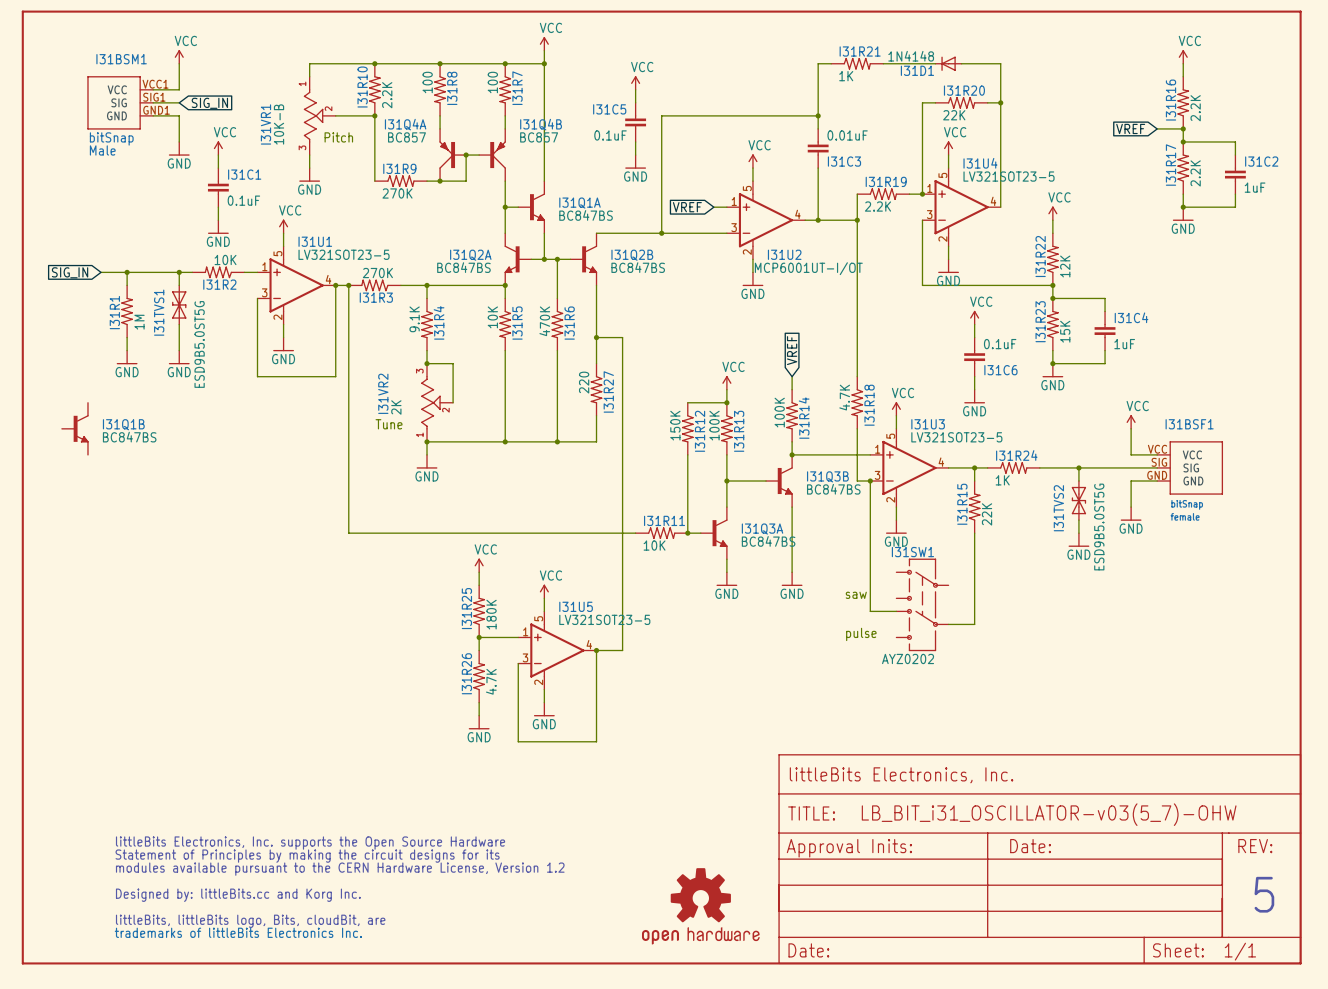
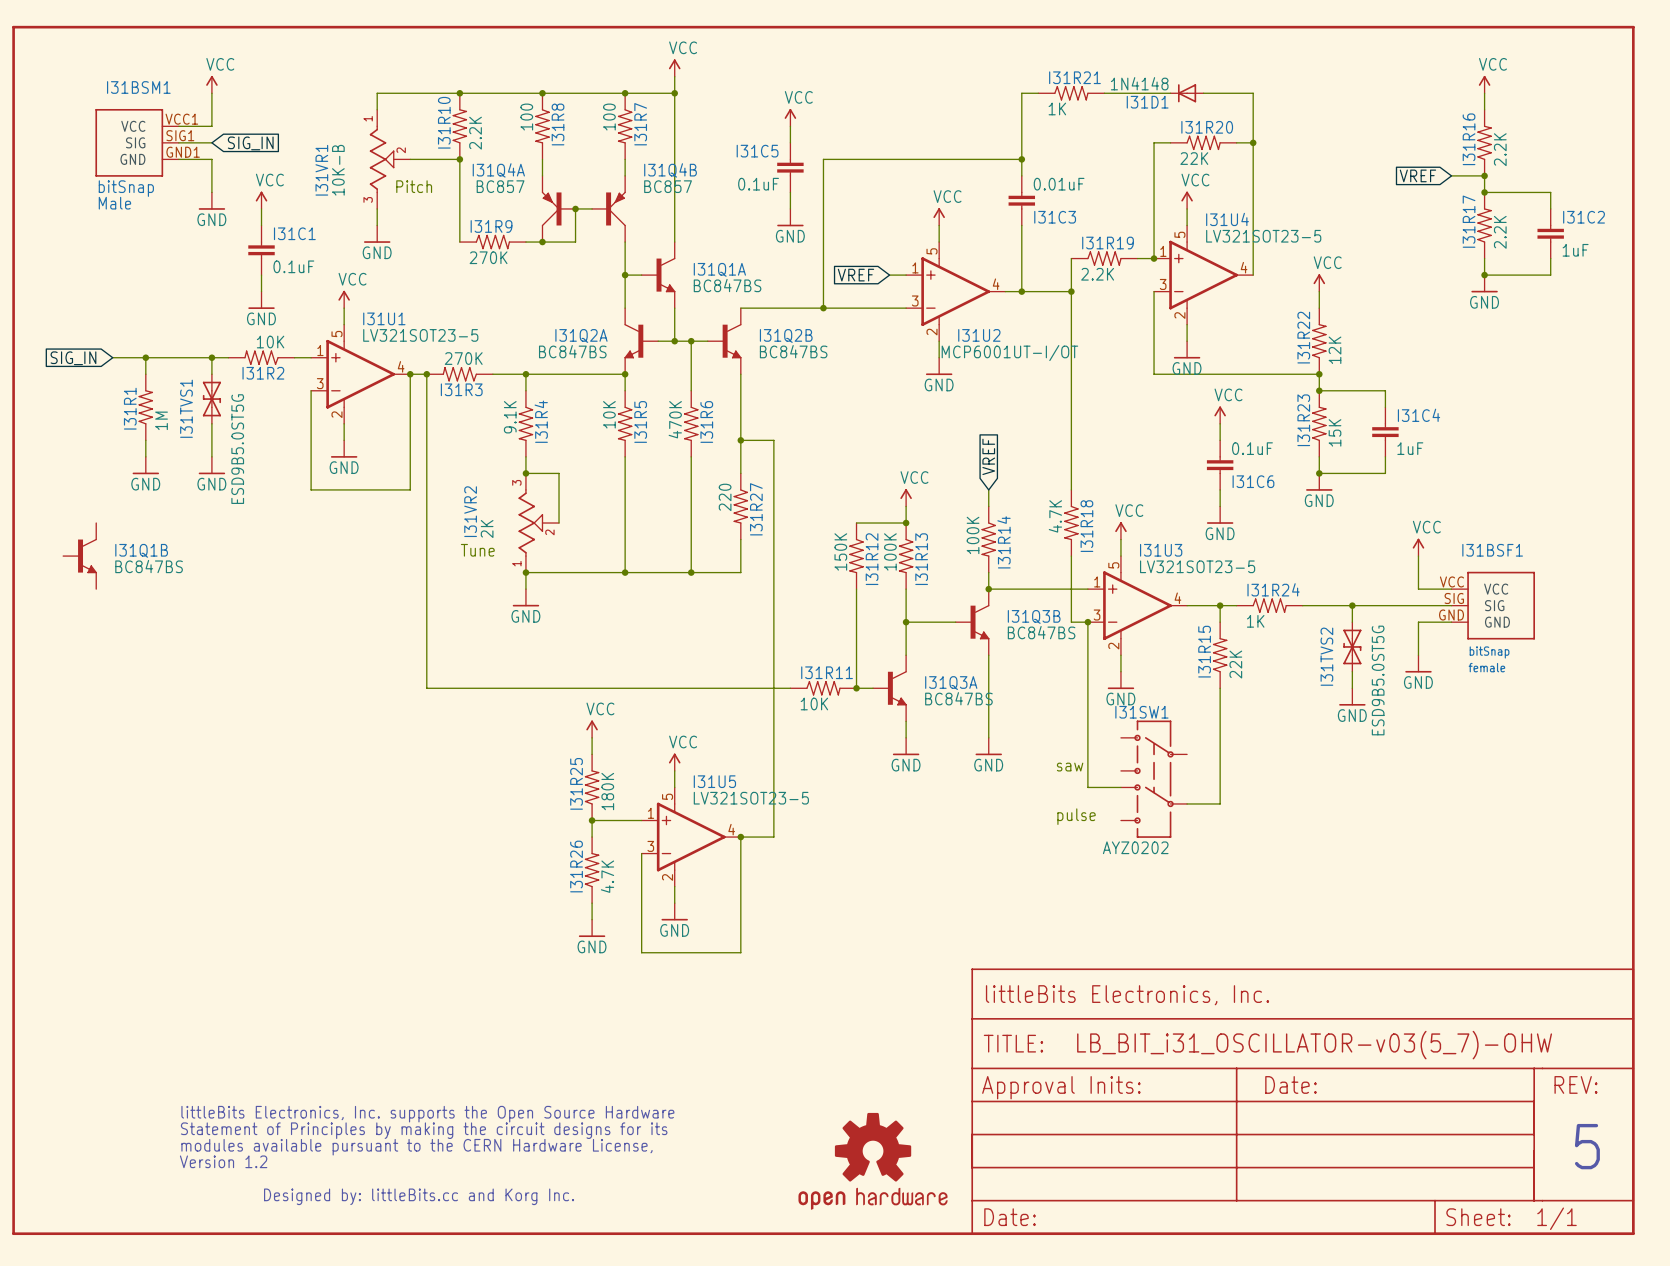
part: (339, 887) -> none
part: none -> (427, 1155)

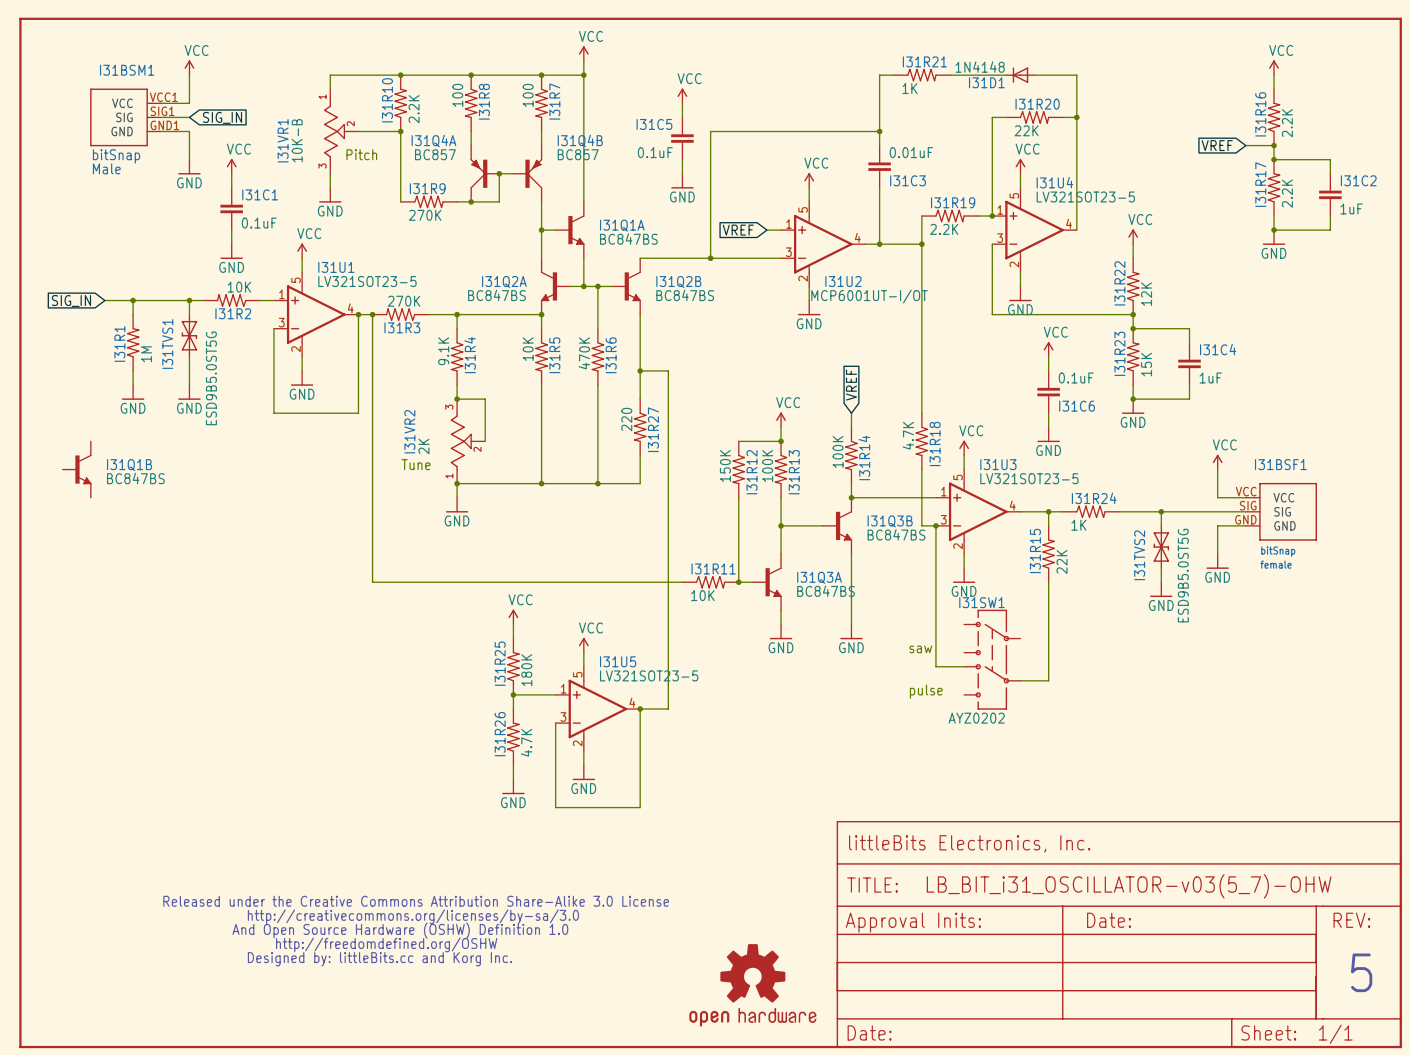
part: none -> (416, 931)
part: (427, 1155) -> none

